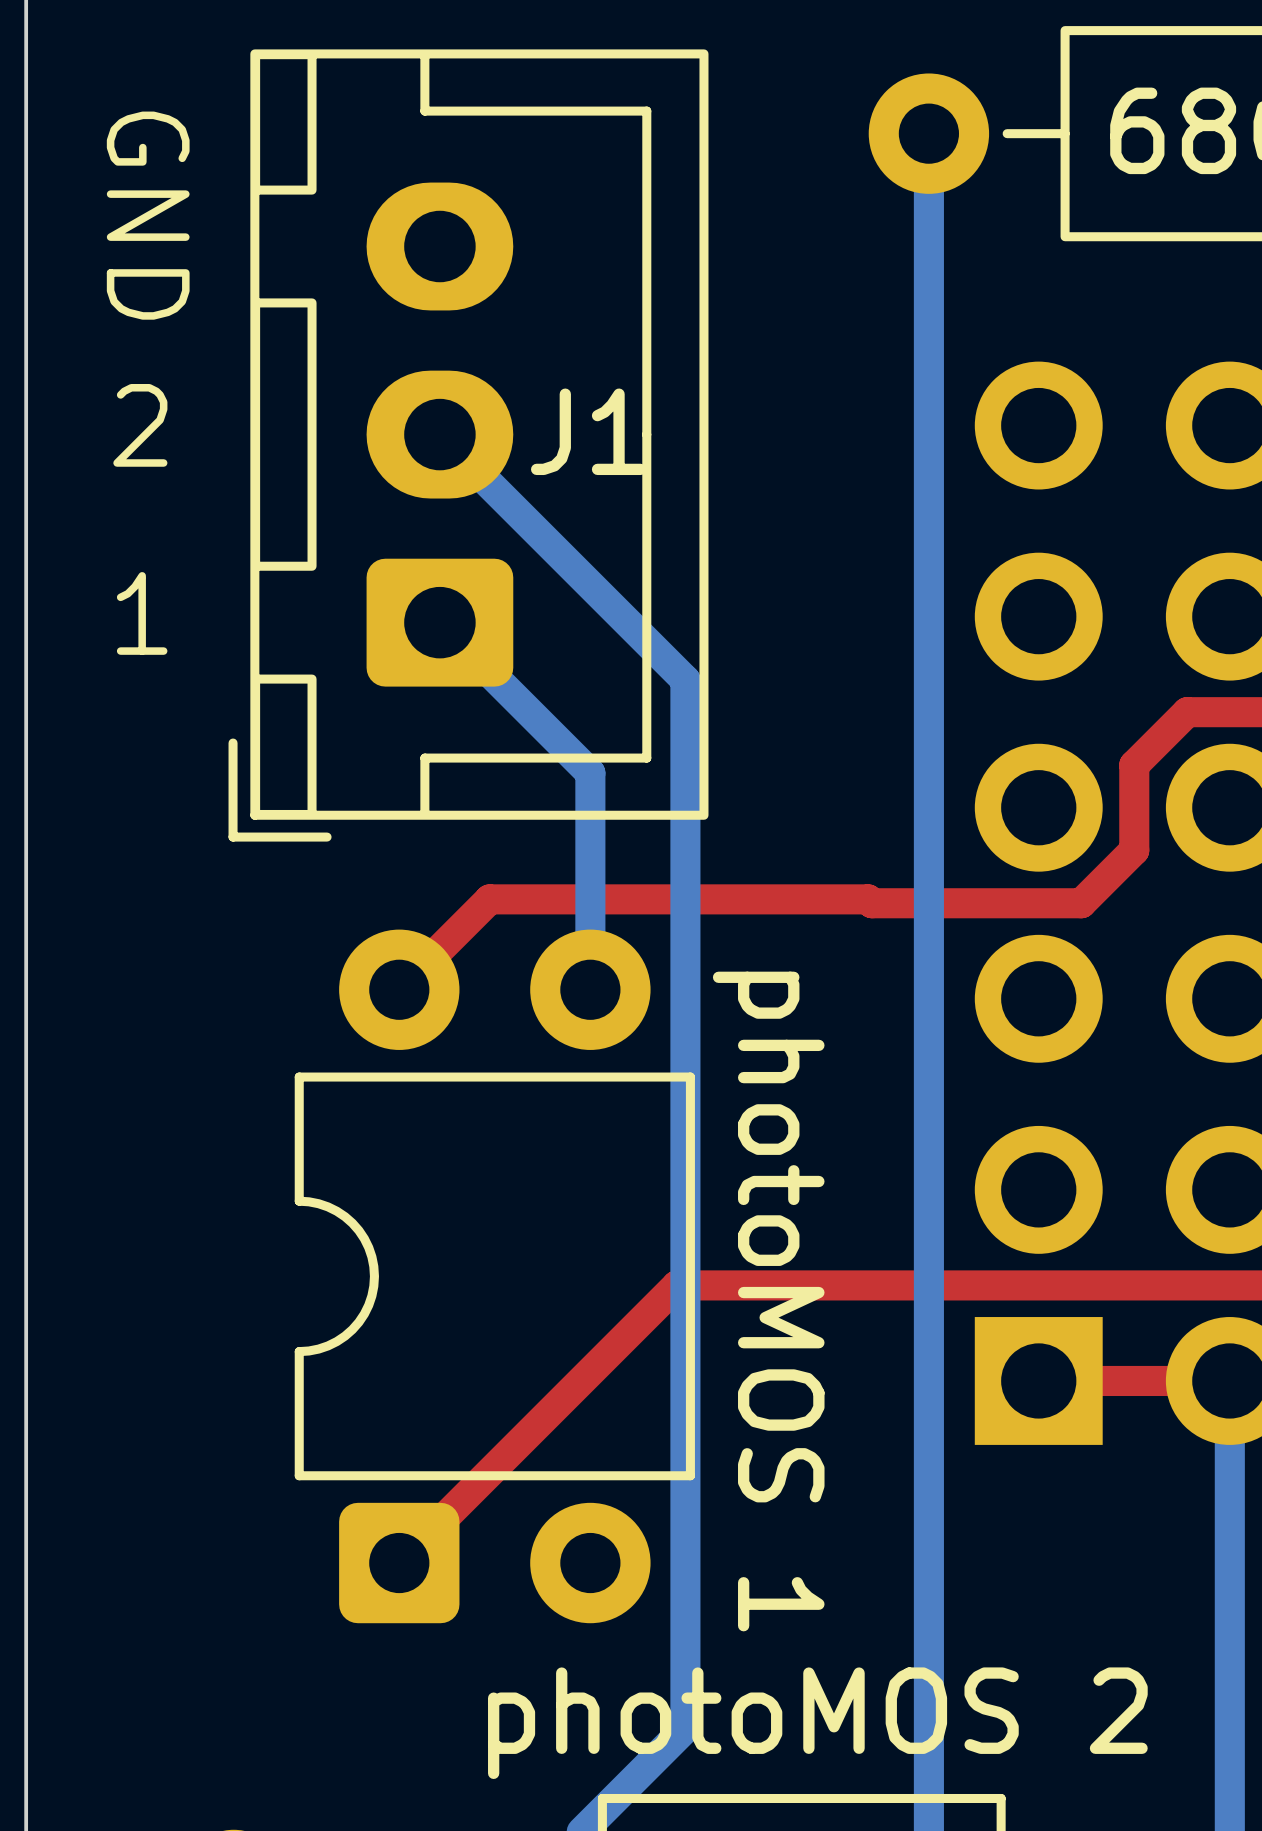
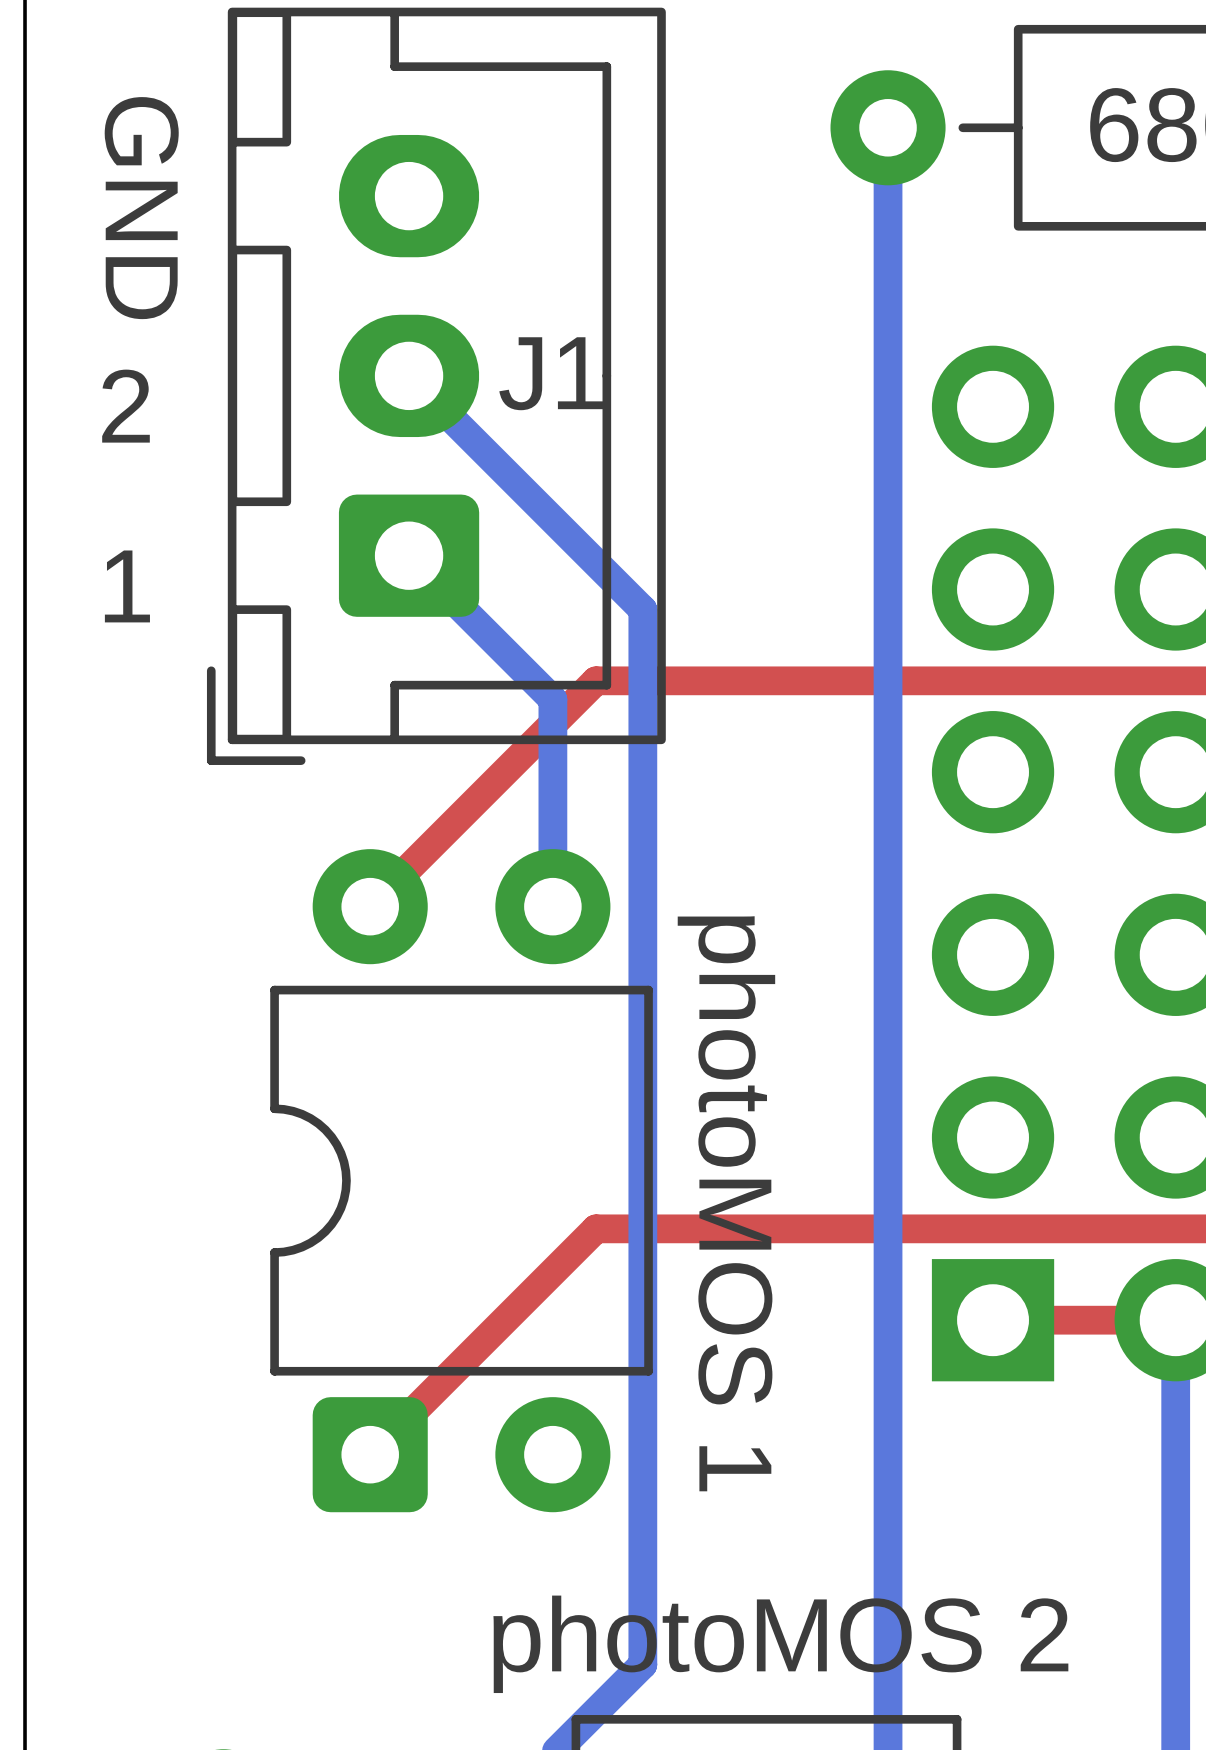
bottom track: (439, 434) (685, 680) (685, 1728) (672, 1741) -> (409, 375) (642, 609) (642, 1664)
J1 position: (468, 445) -> (436, 386)
bottom track: (439, 622) (590, 773) (590, 989) -> (409, 555) (552, 699) (552, 906)
top track: (1187, 712) (1134, 765) (1134, 850) (1081, 903) (872, 903) (868, 899) (489, 899) (399, 989) -> (1134, 680) (596, 680) (370, 906)
photoMOS 1 position: (494, 1276) -> (461, 1180)
top track: (676, 1285) (399, 1563) -> (647, 1228) (596, 1228) (370, 1454)

